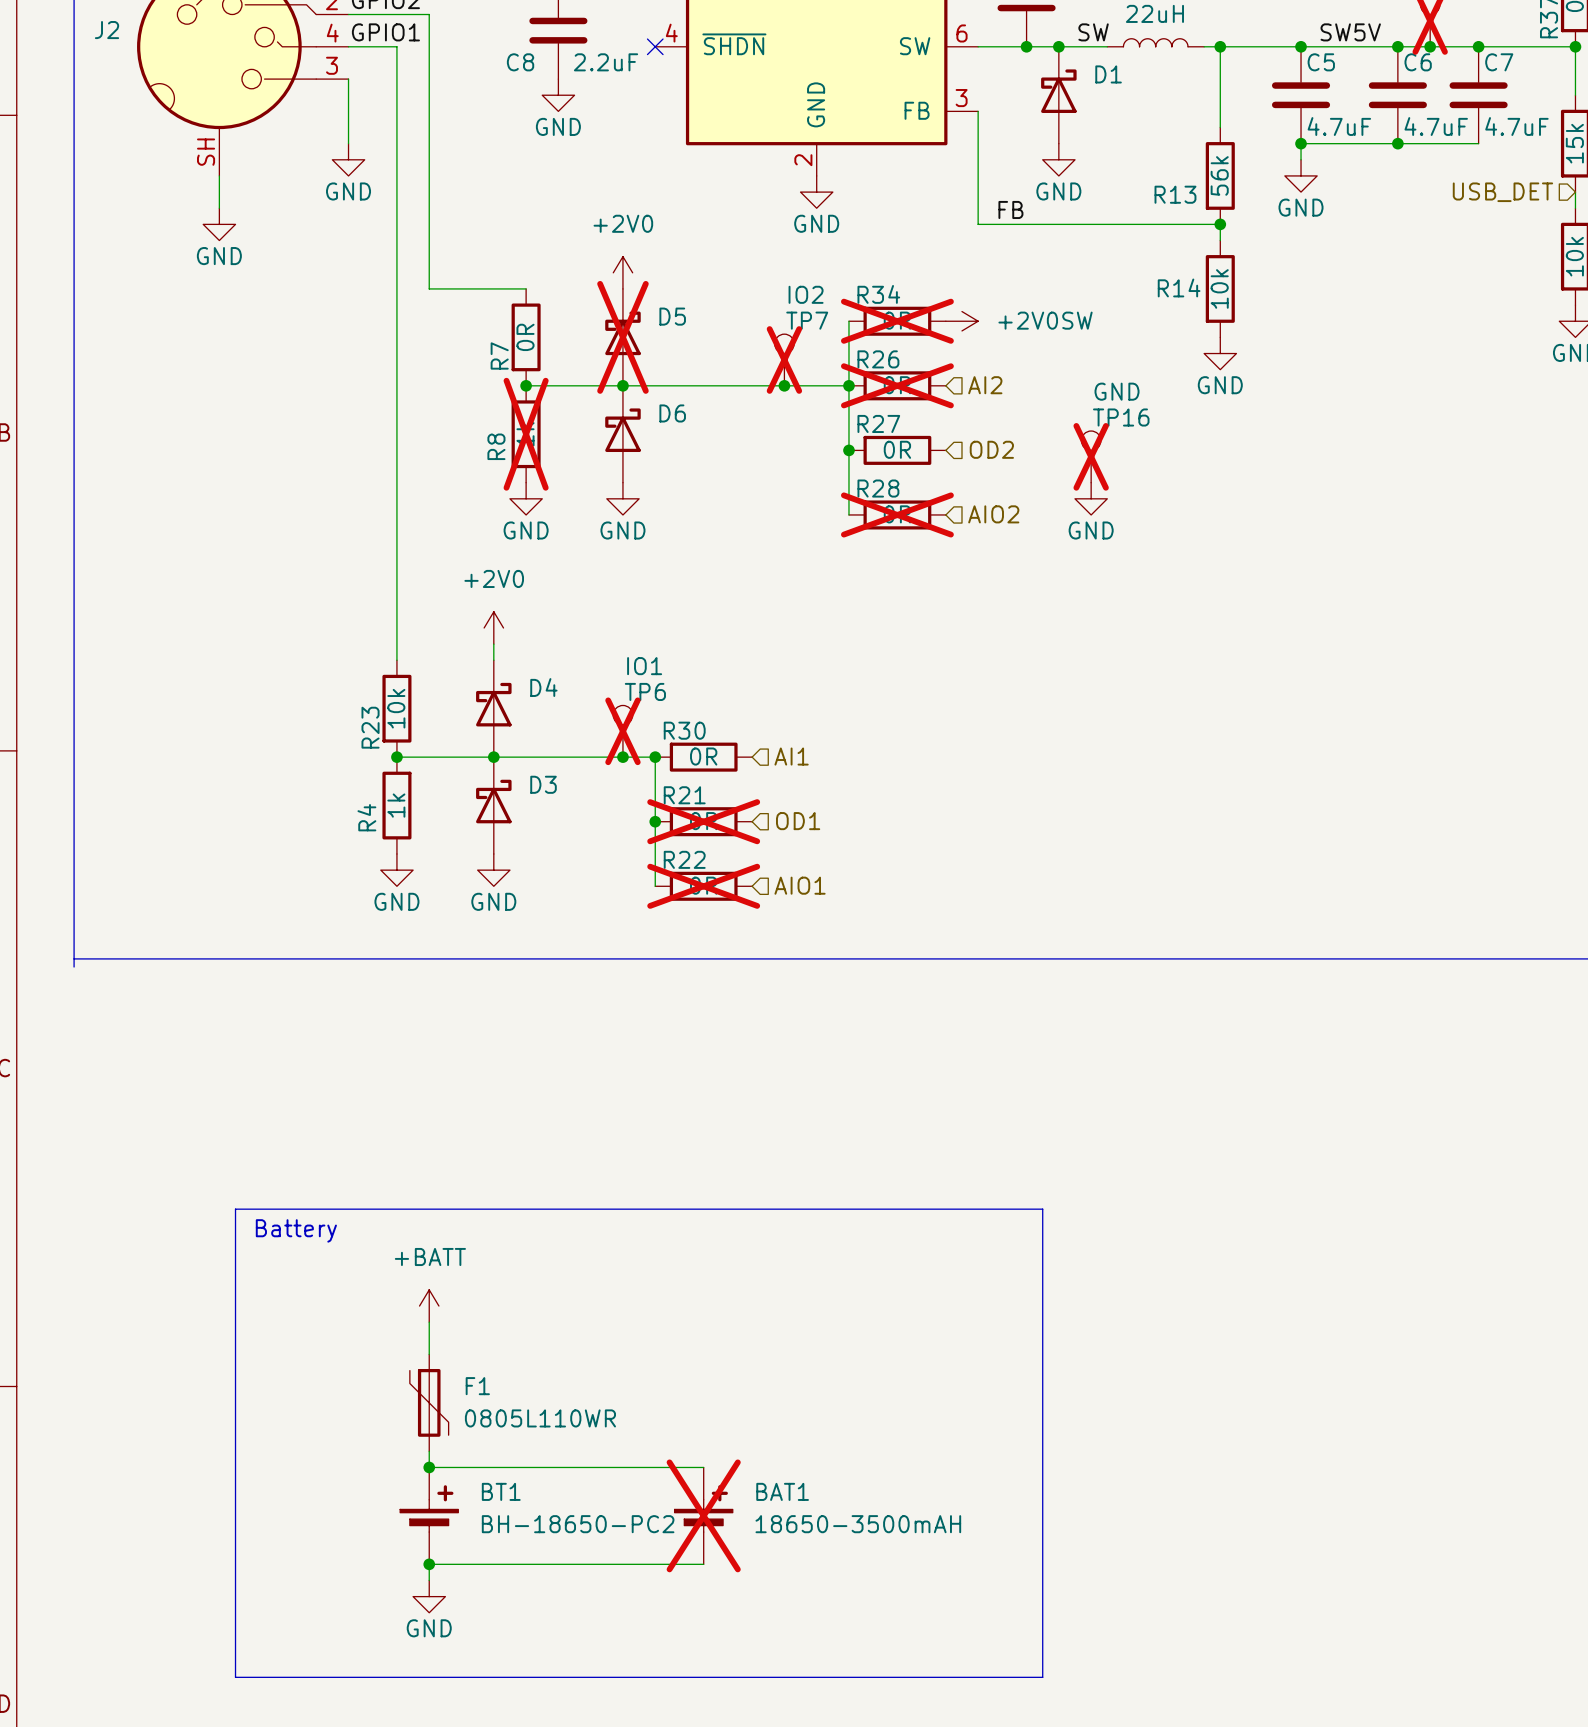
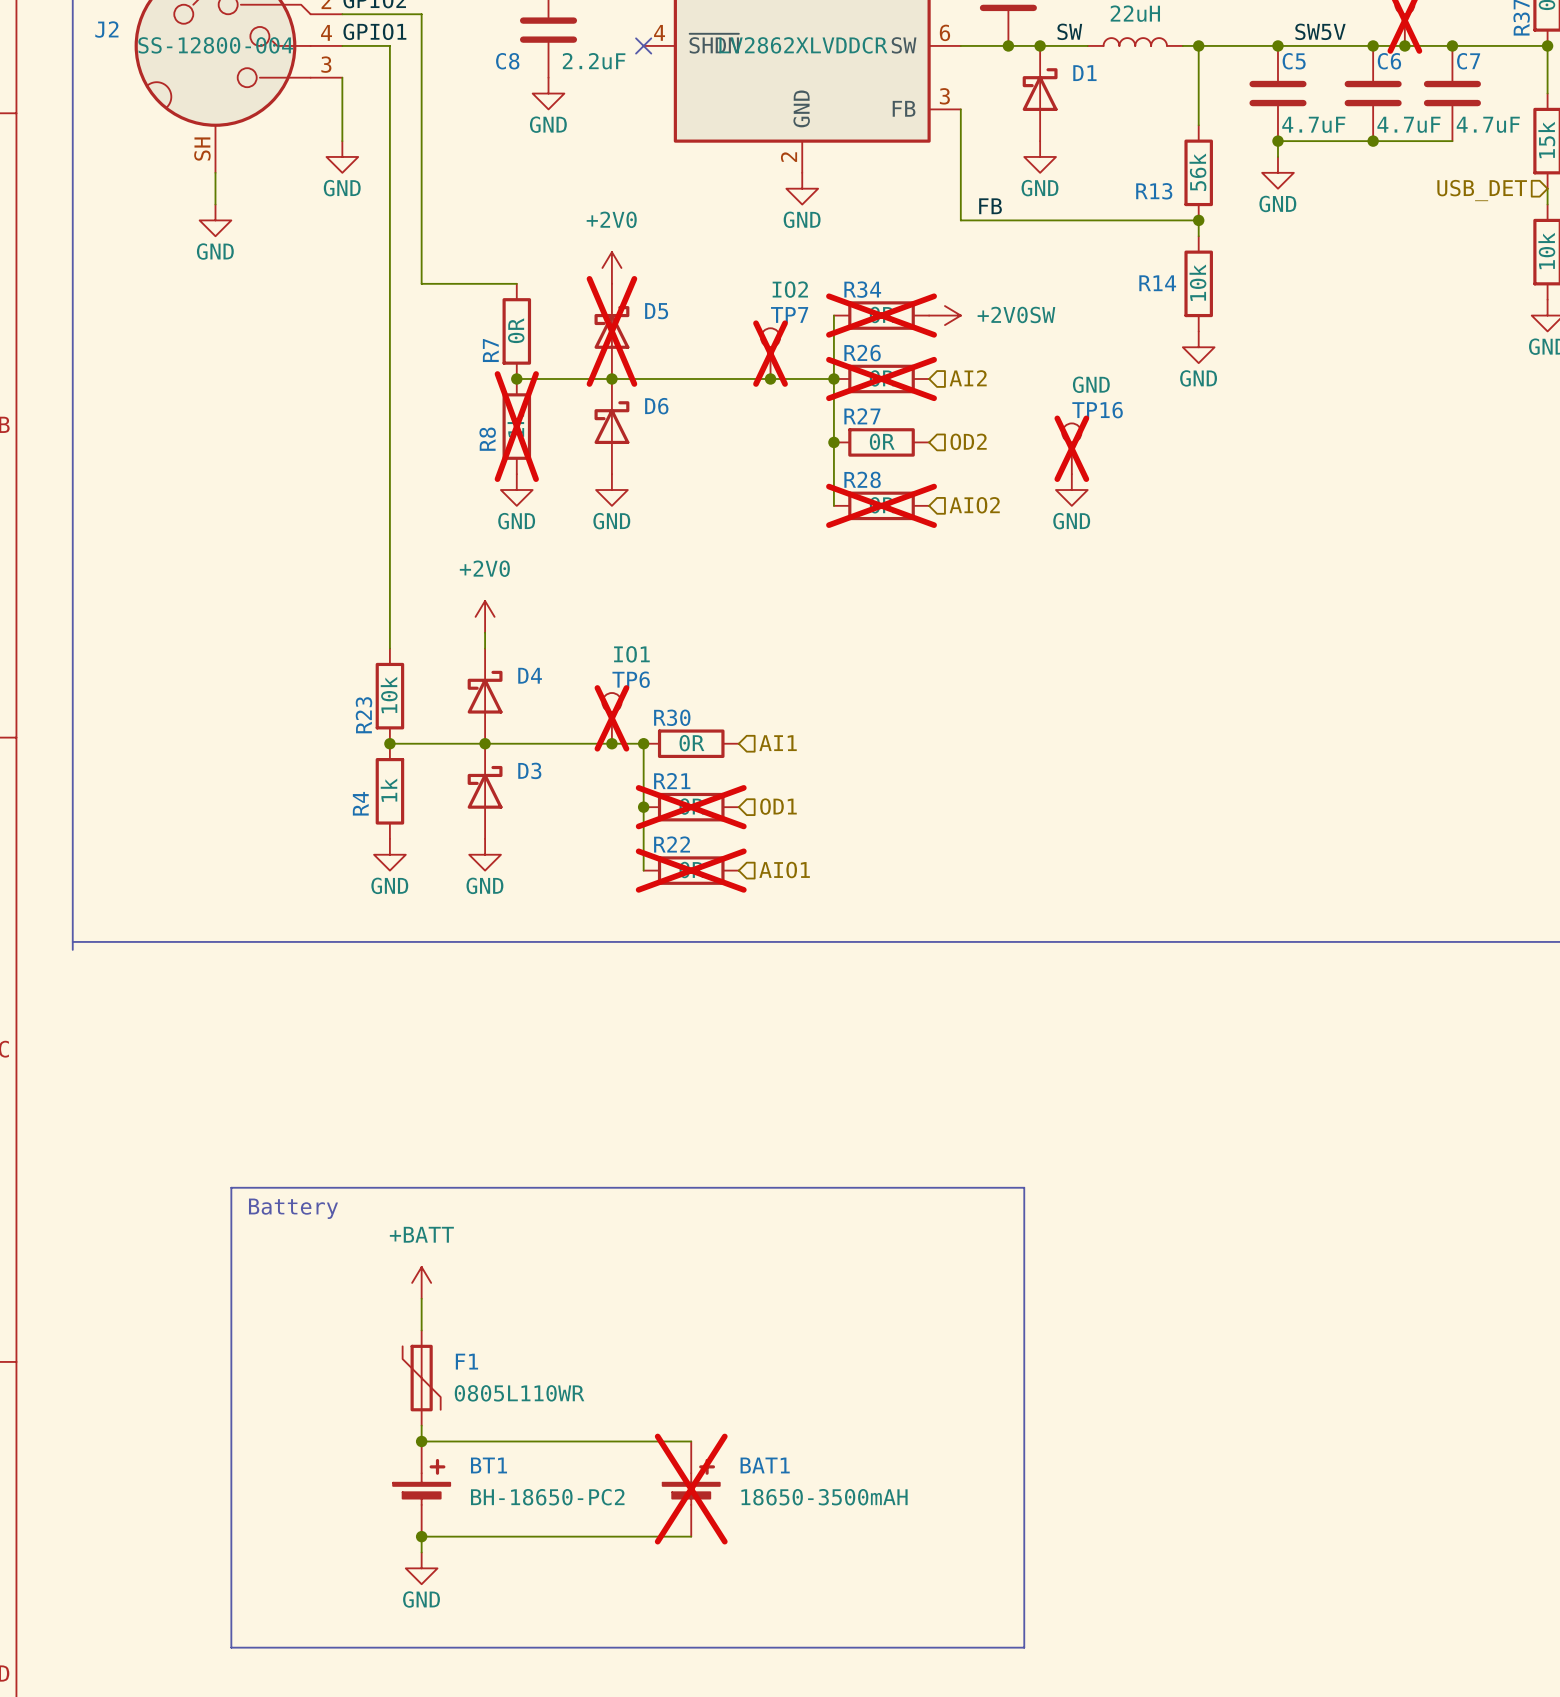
J2 text: none -> SS-12800-004 (215, 45)
part text: none -> LV2862XLVDDCR (803, 45)

